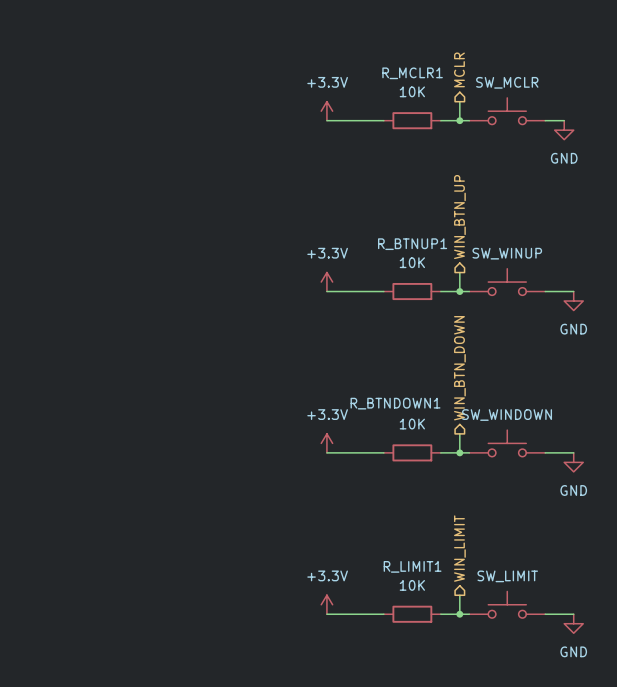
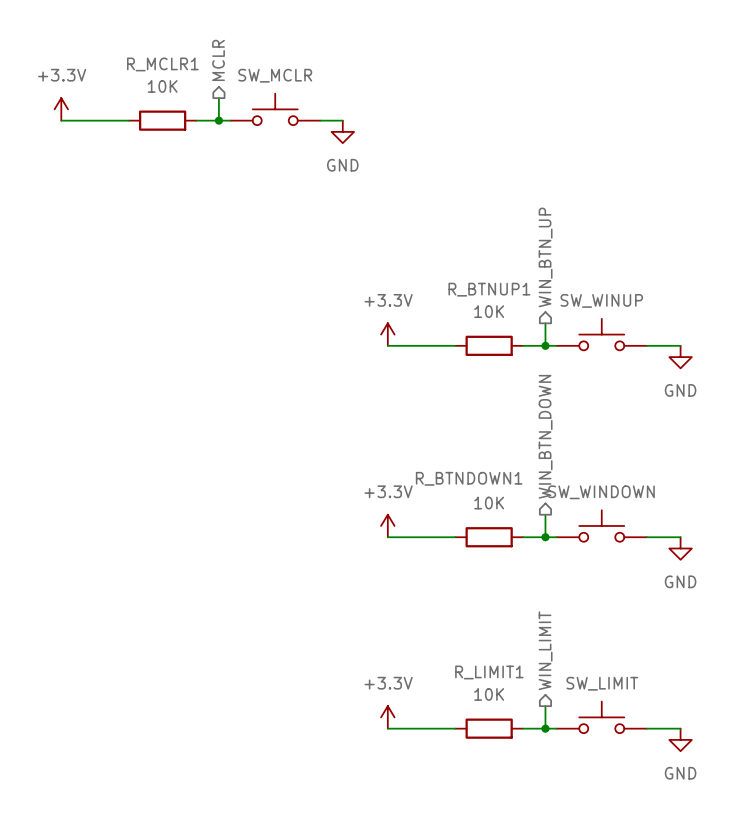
hierarchical label: none -> MCLR (218, 60)
hierarchical label: MCLR (459, 69) -> none
wire: none -> (218, 98) (218, 120)
power symbol: none -> +3.3V (61, 109)
part: none -> SW_MCLR (275, 109)
wire: none -> (61, 120) (128, 120)
wire: none -> (196, 120) (230, 120)
junction: none -> (218, 120)
wire: none -> (320, 120) (342, 120)
wire: (459, 101) (459, 120) -> none
power symbol: none -> GND (342, 131)
power symbol: +3.3V (326, 111) -> none
part: SW_MCLR (507, 111) -> none
wire: (326, 120) (383, 120) -> none
R_MCLR1 position: (412, 120) -> (162, 120)
wire: (440, 120) (469, 120) -> none
junction: (459, 120) -> none
wire: (545, 120) (564, 120) -> none
power symbol: GND (564, 130) -> none

